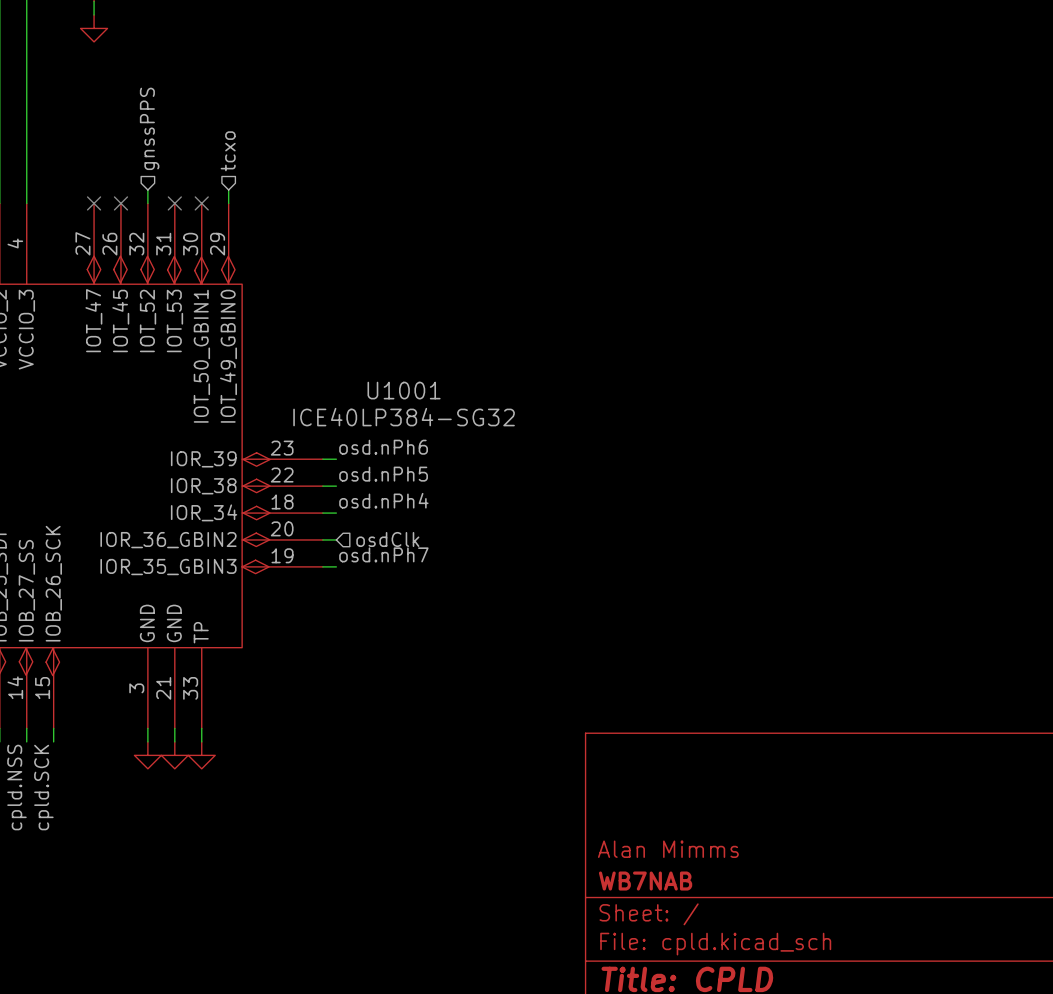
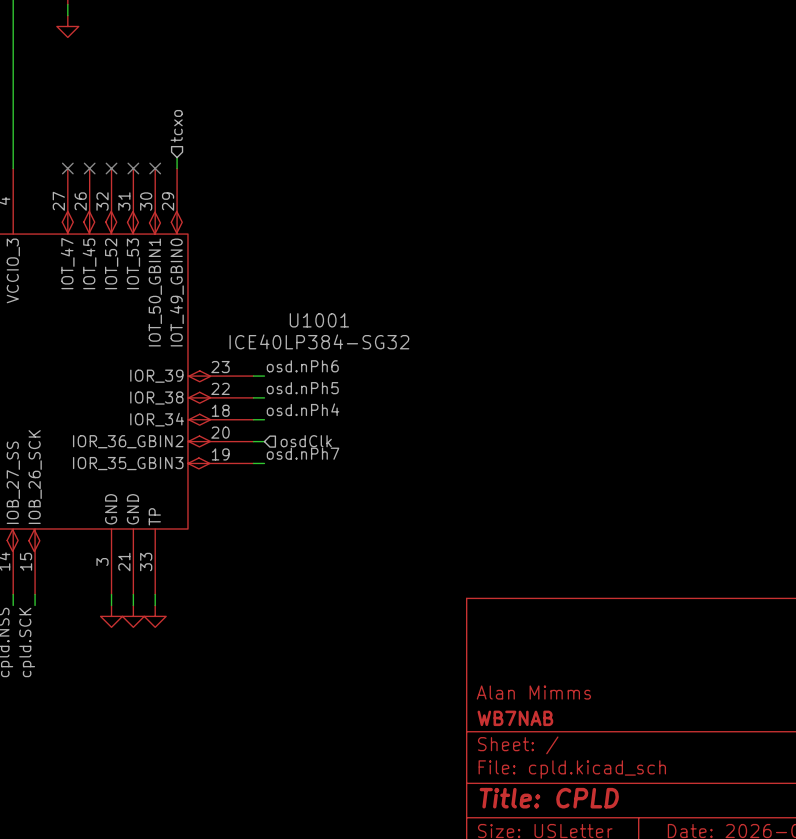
hierarchical label: gnssPPS (149, 128) -> none
wire: (147, 189) (147, 203) -> none
no-connect mark: none -> (111, 168)

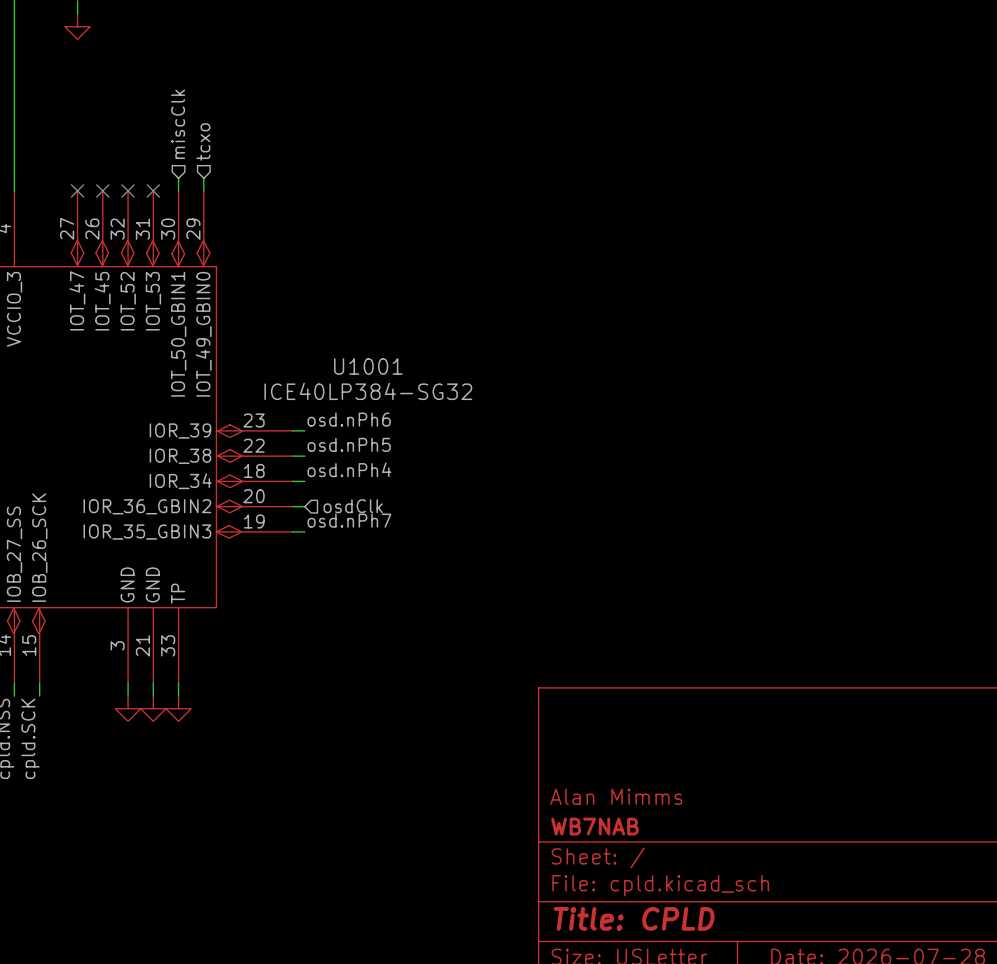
hierarchical label: none -> miscClk (178, 124)
wire: none -> (178, 178) (178, 190)
no-connect mark: (155, 168) -> none

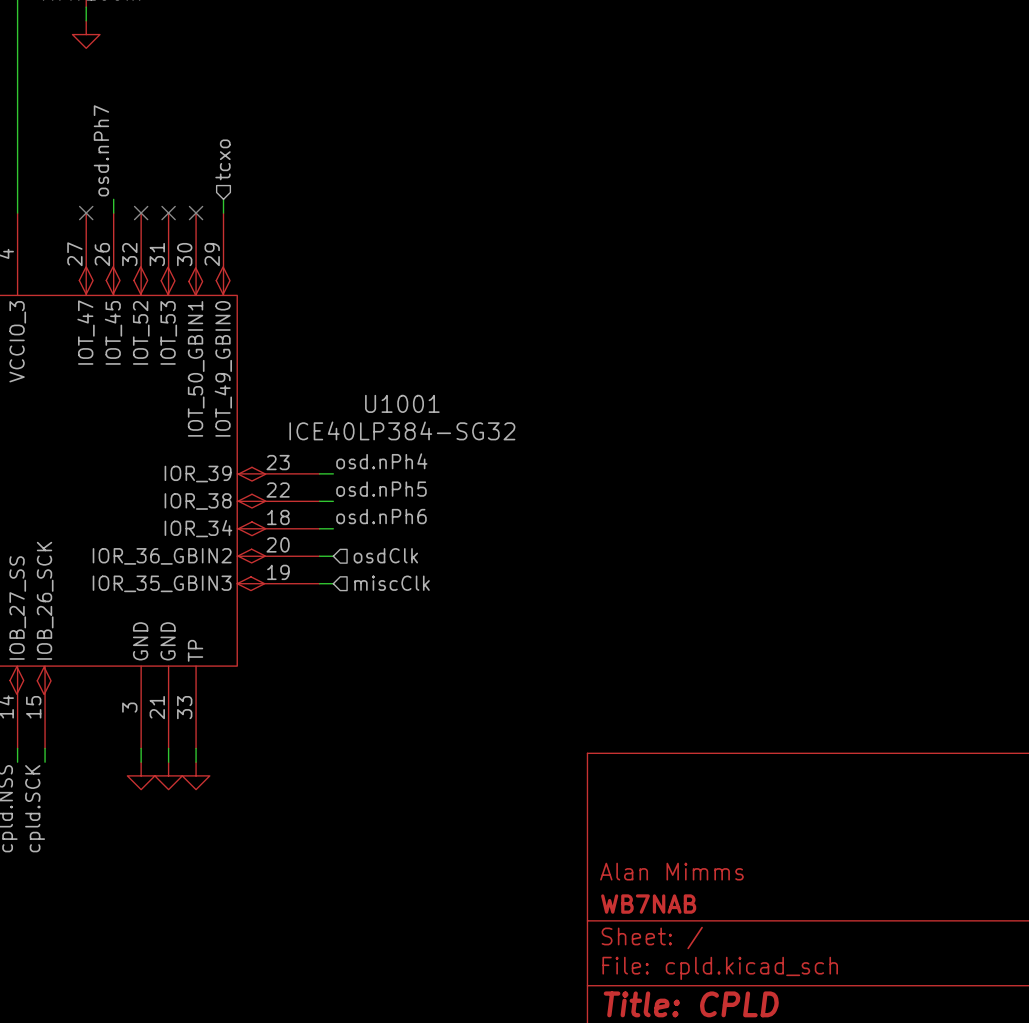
hierarchical label: miscClk (178, 124) -> none
label: none -> osd.nPh7 (101, 150)
wire: (178, 178) (178, 190) -> (113, 199) (113, 213)
no-connect mark: (102, 190) -> none
no-connect mark: none -> (196, 213)
label: osd.nPh6 (349, 419) -> osd.nPh4 (381, 461)
label: osd.nPh4 (349, 469) -> osd.nPh6 (381, 516)
label: osd.nPh7 (349, 520) -> none
hierarchical label: none -> miscClk (392, 583)

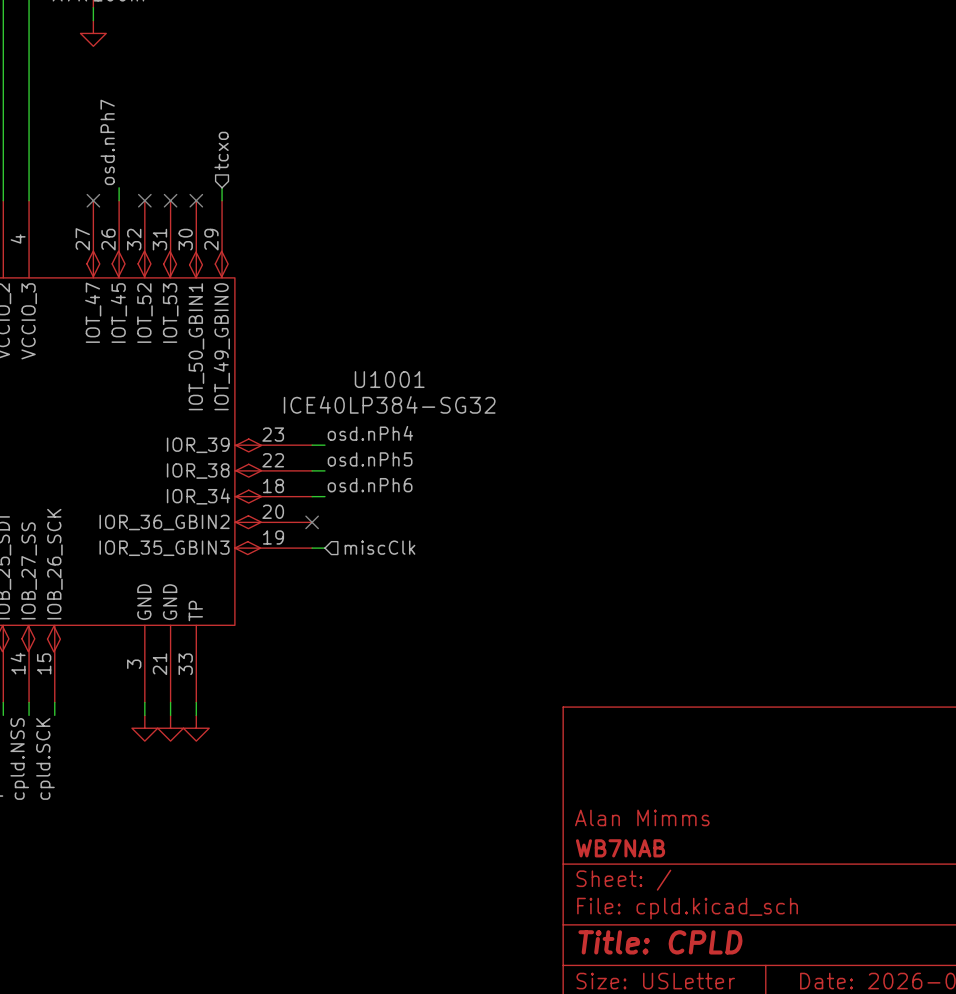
hierarchical label: osdClk (385, 555) -> none
wire: (319, 556) (333, 556) -> none
no-connect mark: none -> (312, 522)

